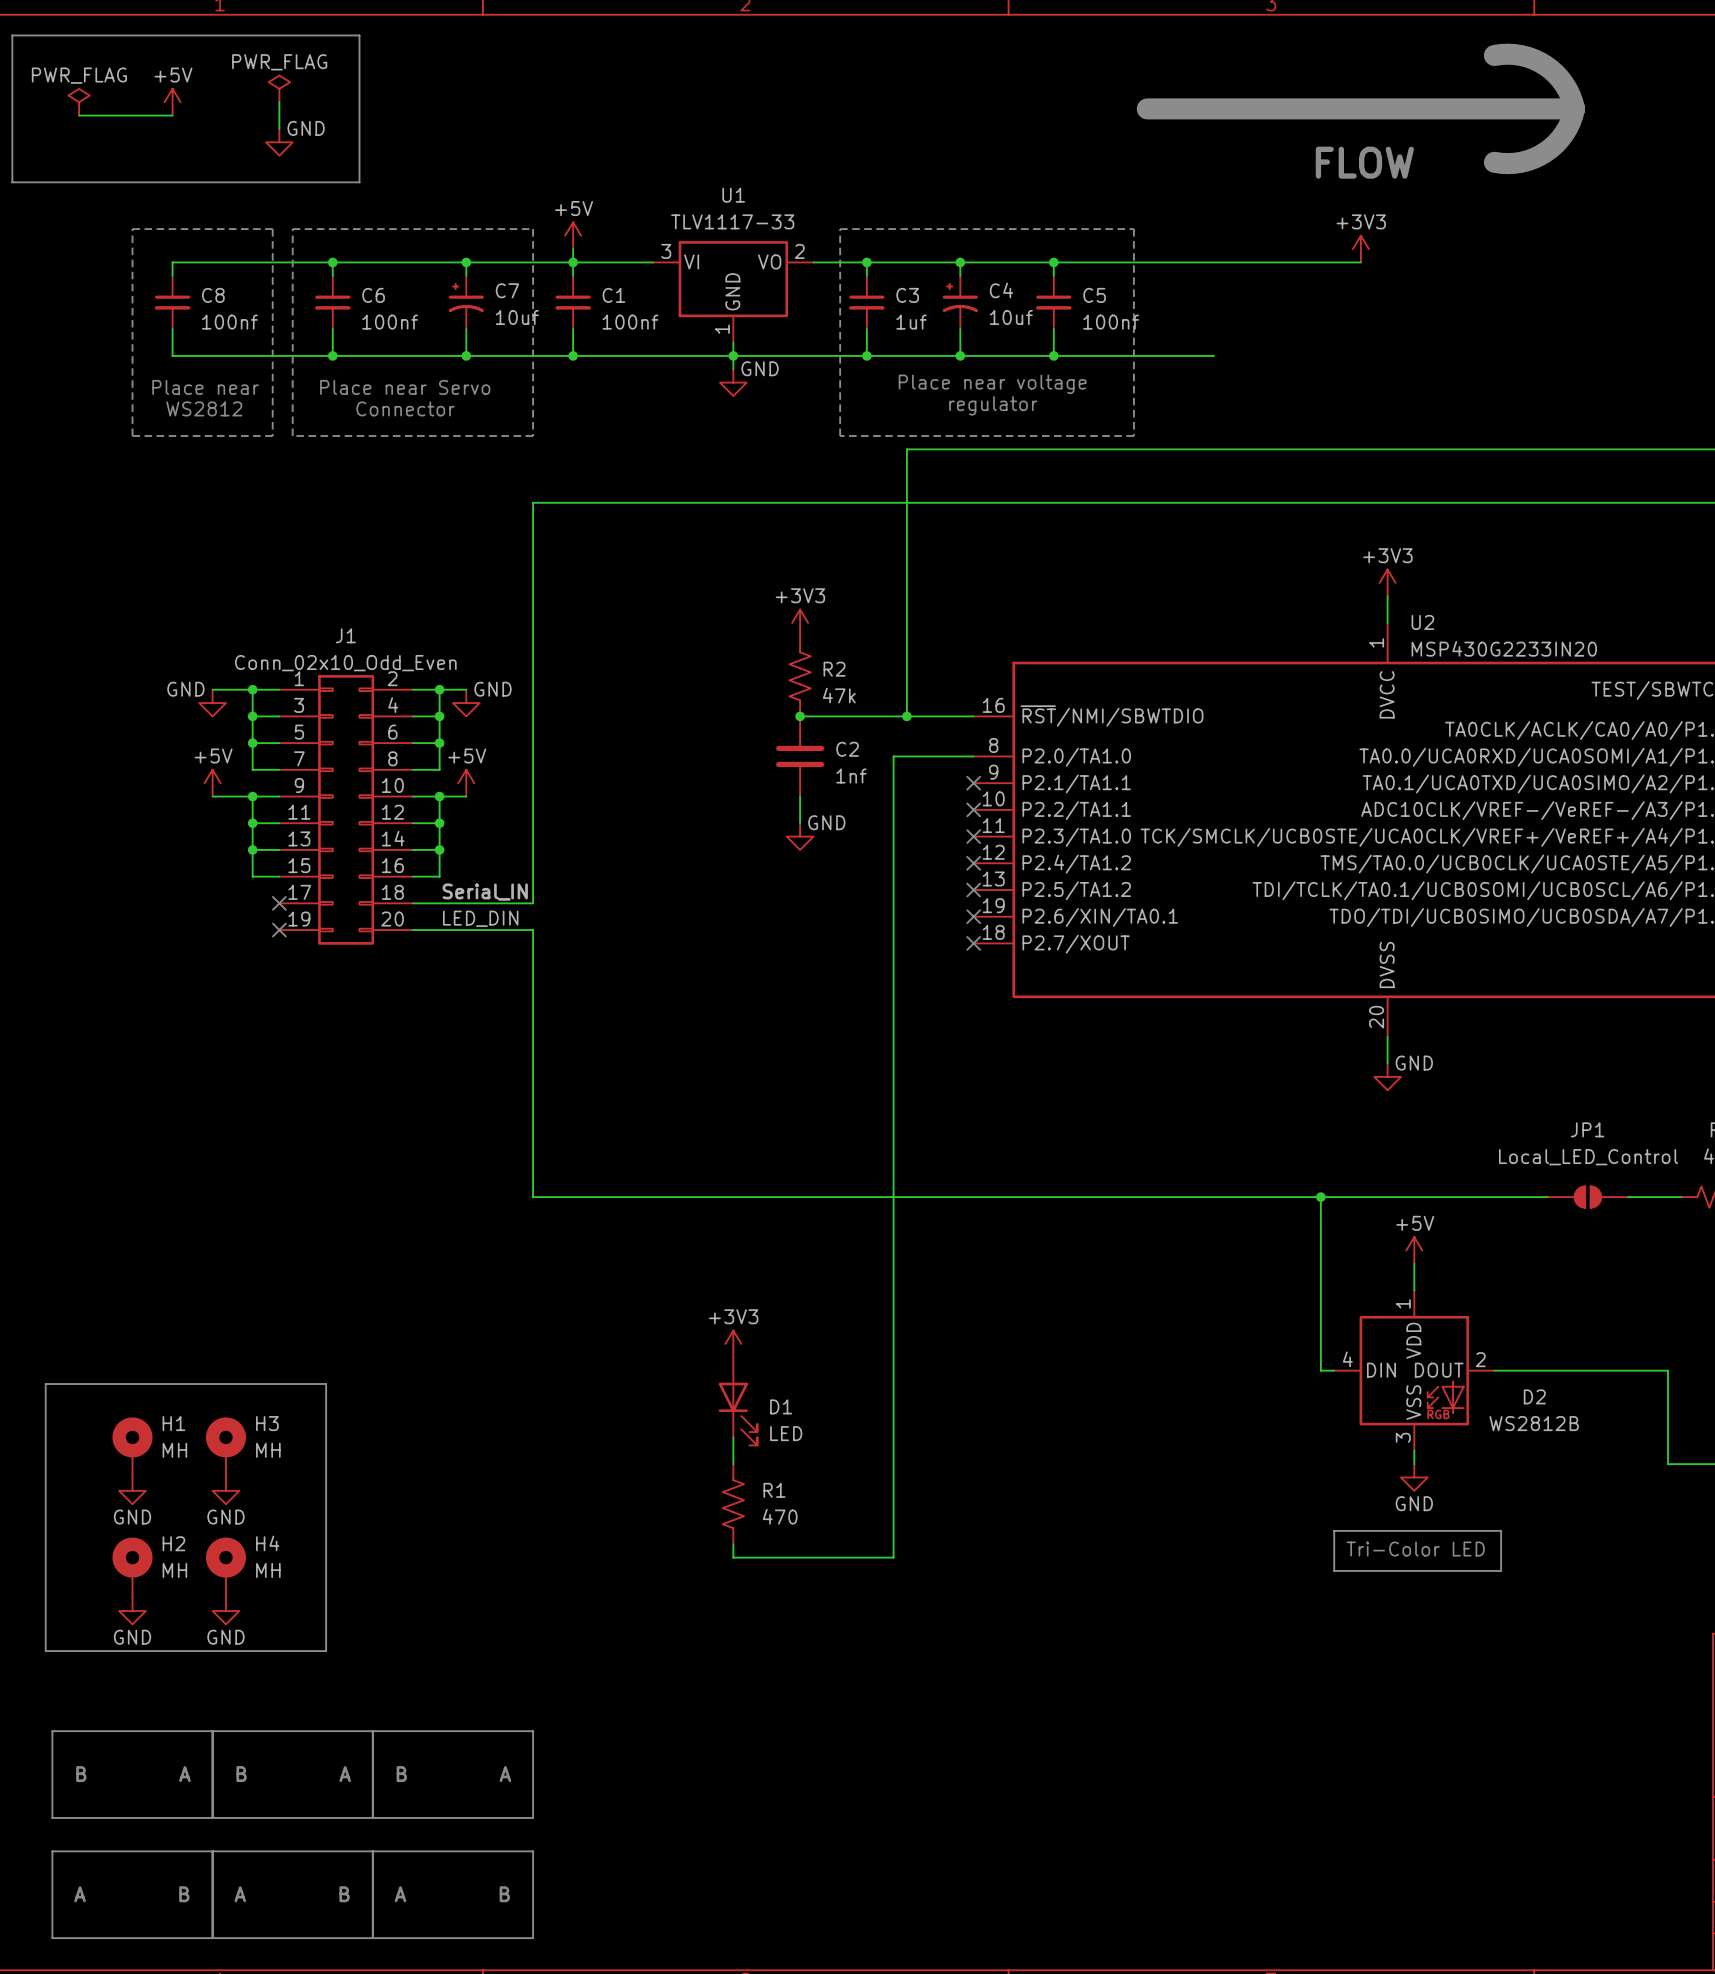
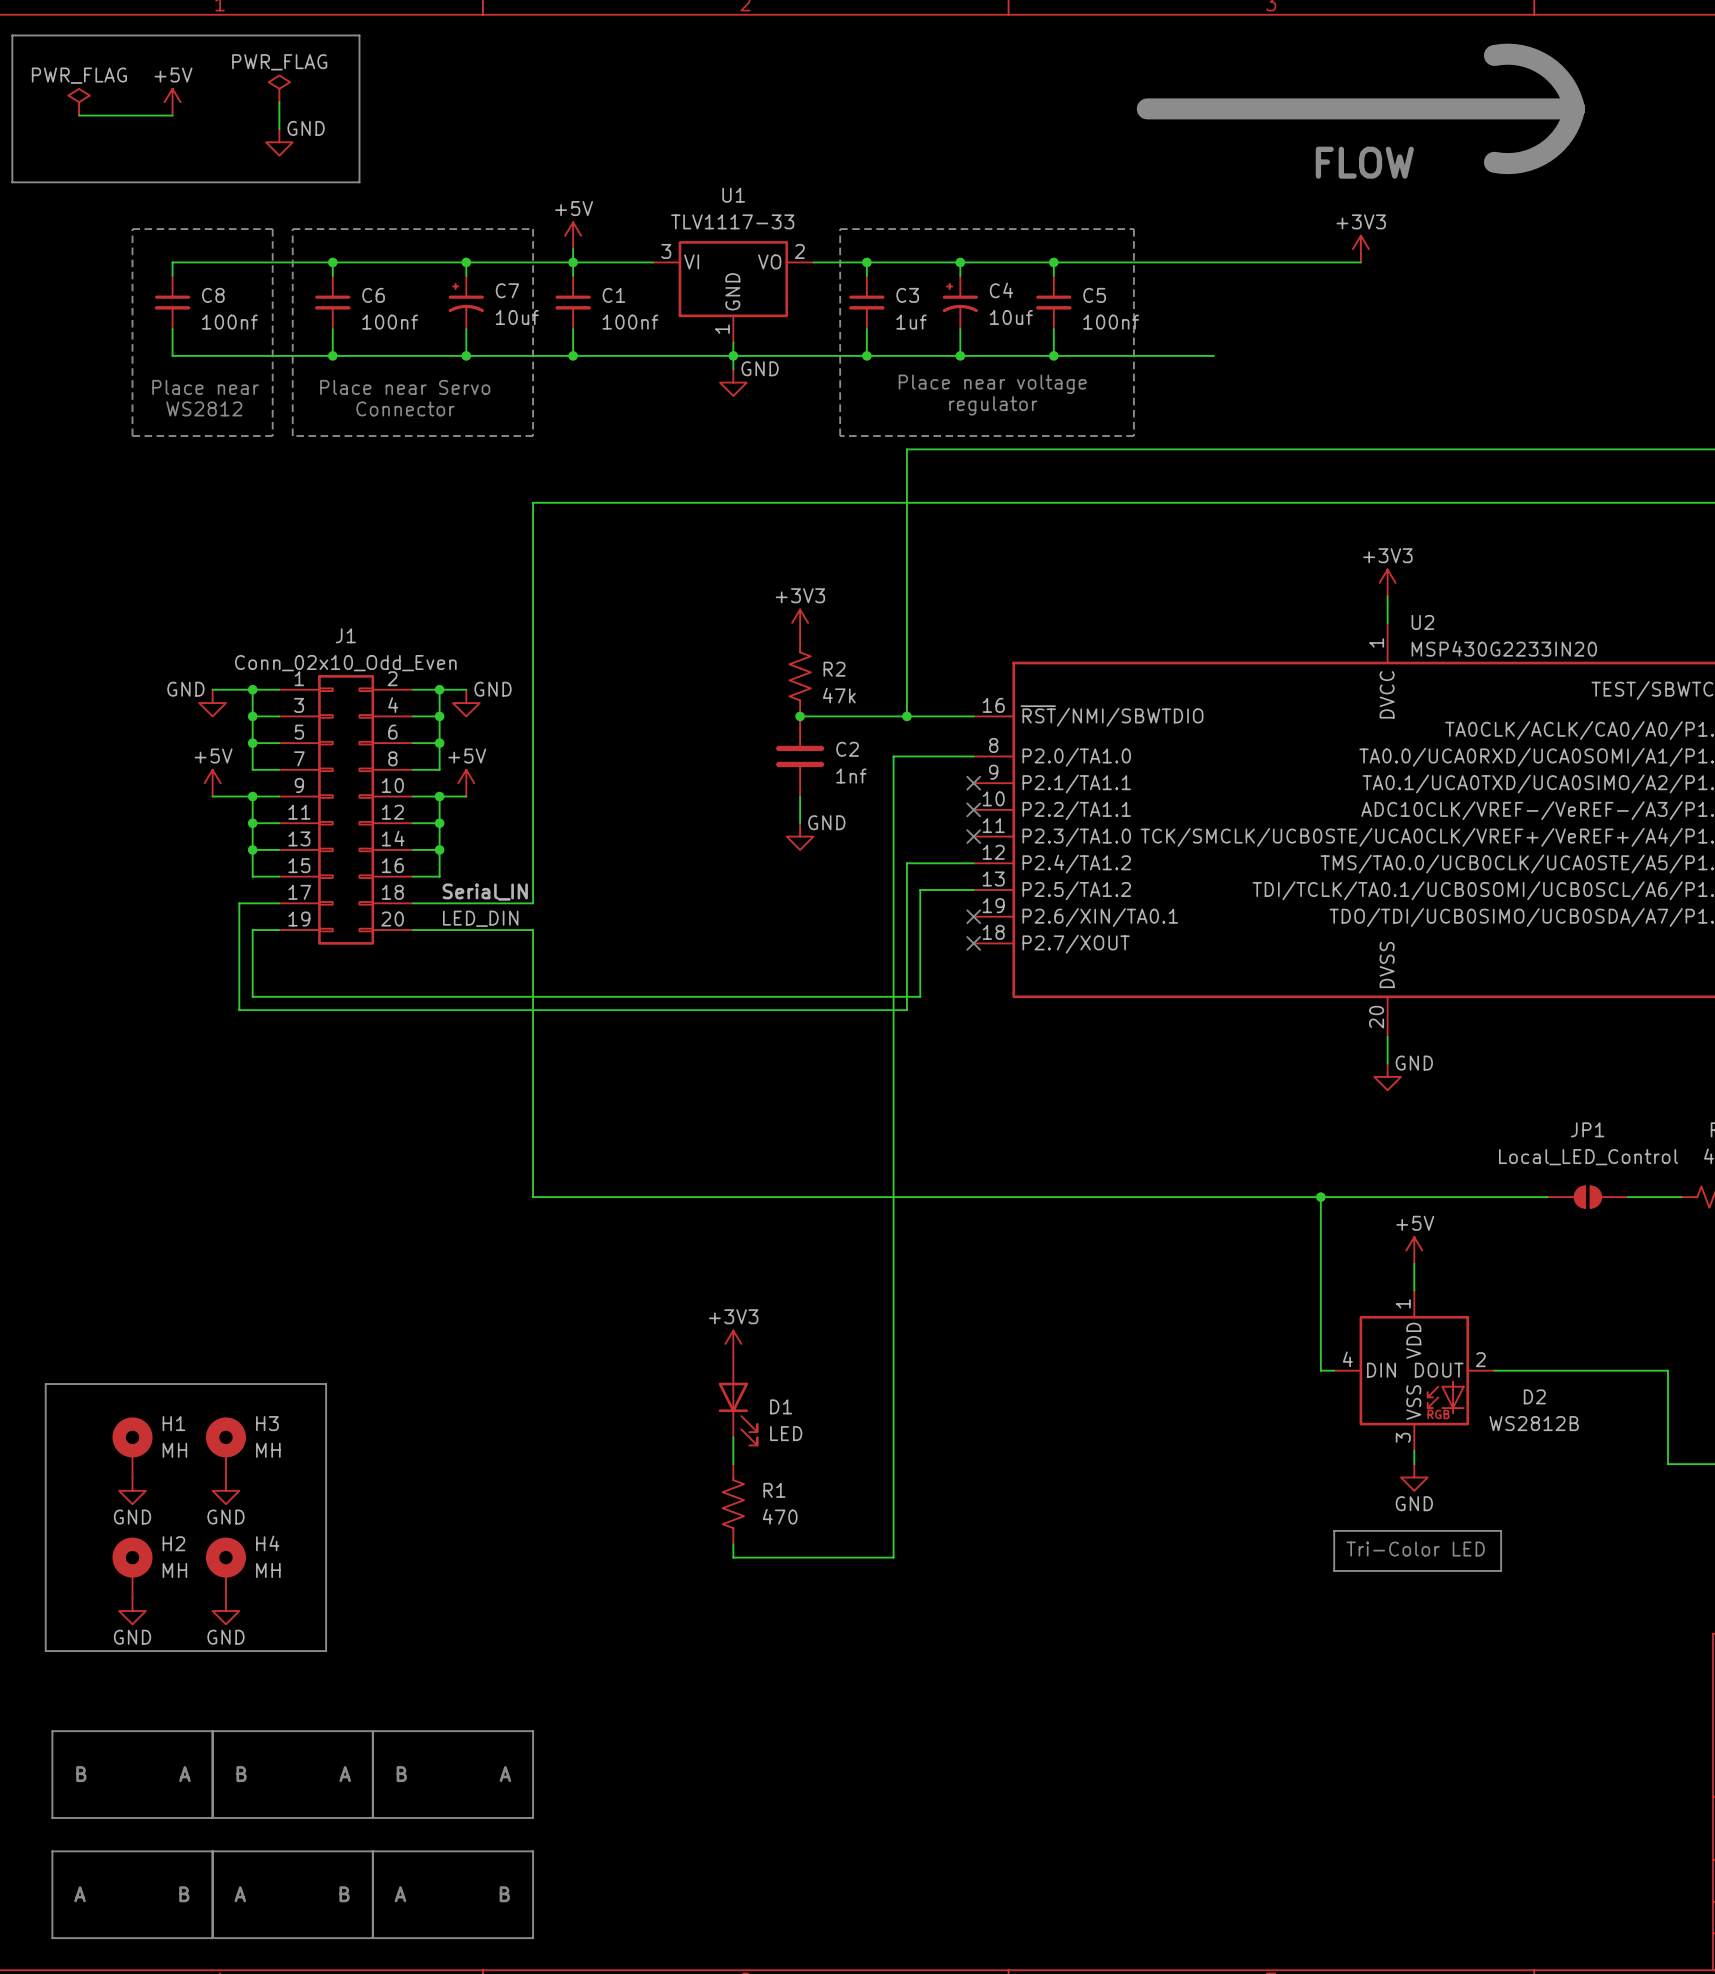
wire: none -> (973, 863) (906, 863) (906, 1010) (239, 1010) (239, 903) (279, 903)
no-connect mark: (973, 863) -> none
wire: none -> (973, 889) (920, 889) (920, 996) (252, 996) (252, 930) (279, 930)
no-connect mark: (973, 889) -> none
no-connect mark: (279, 903) -> none
no-connect mark: (279, 930) -> none

